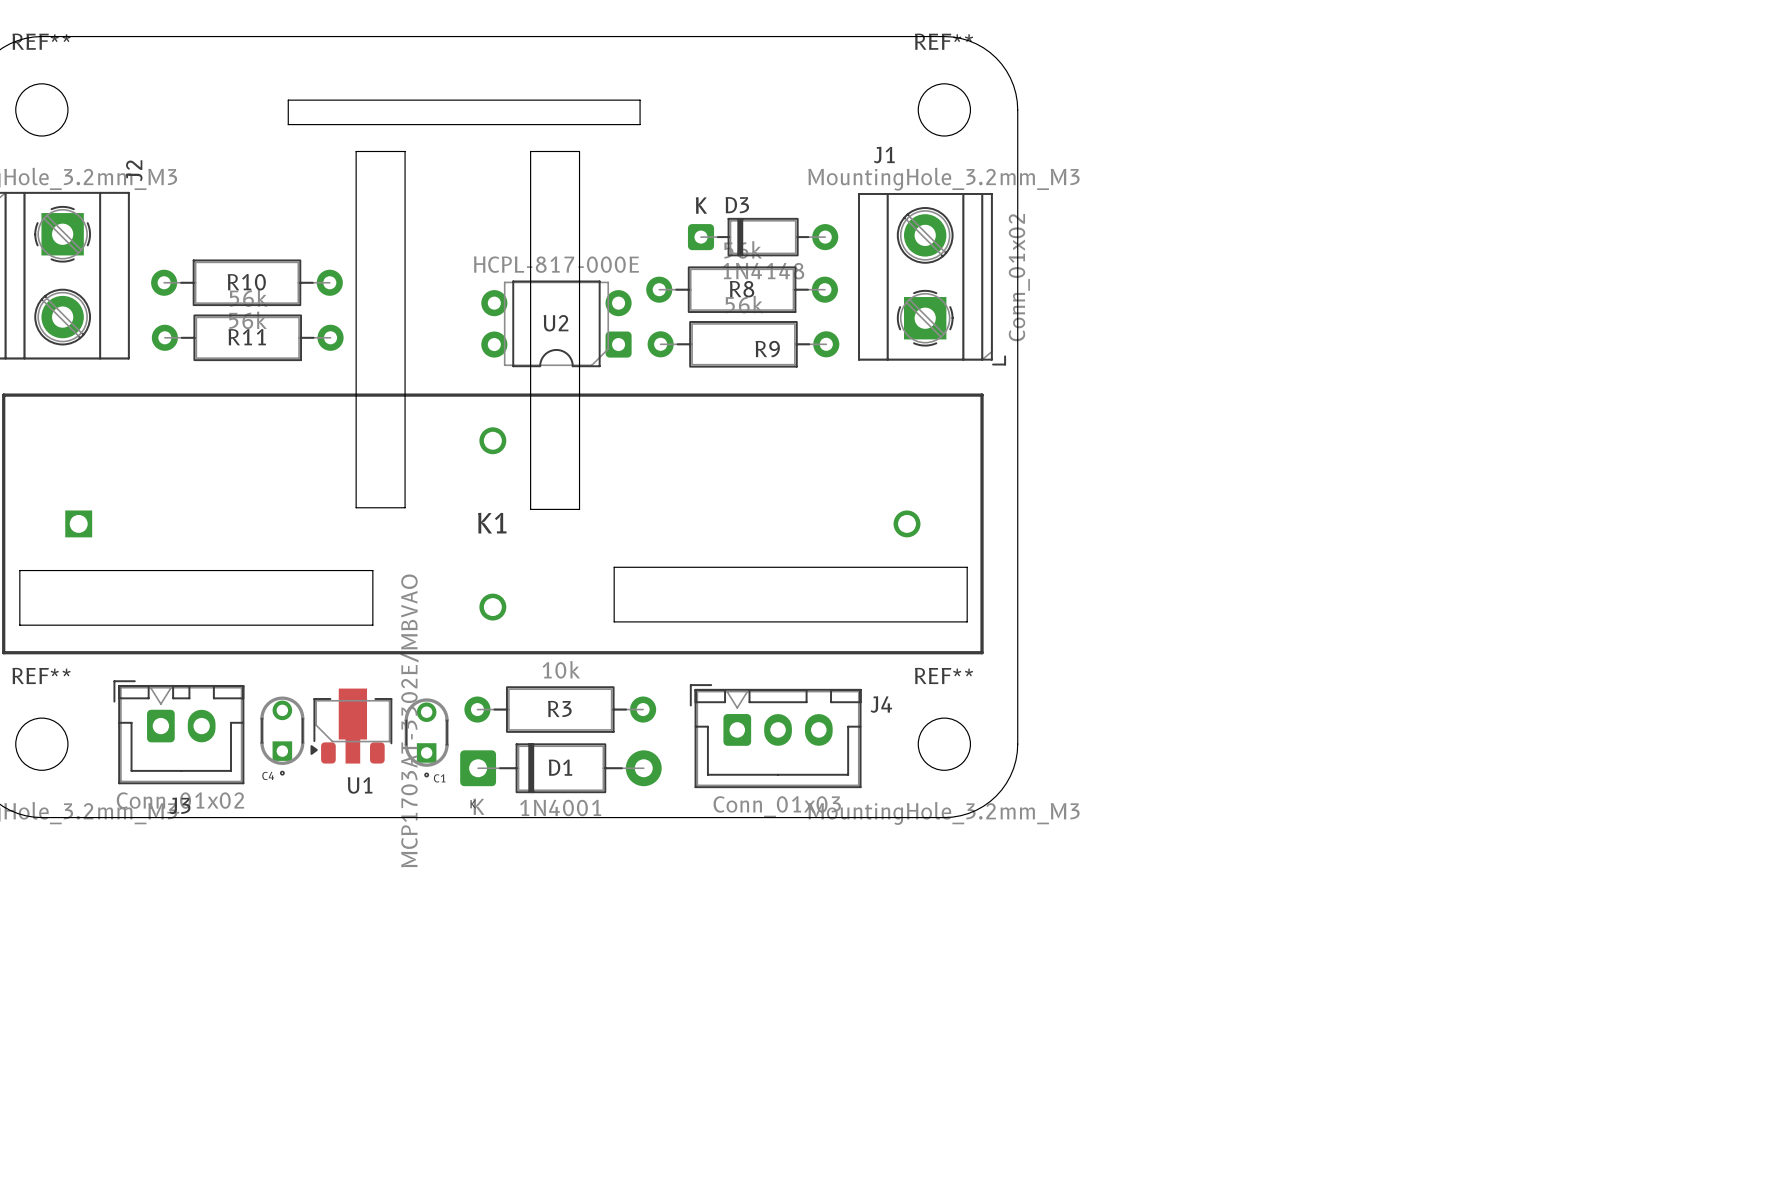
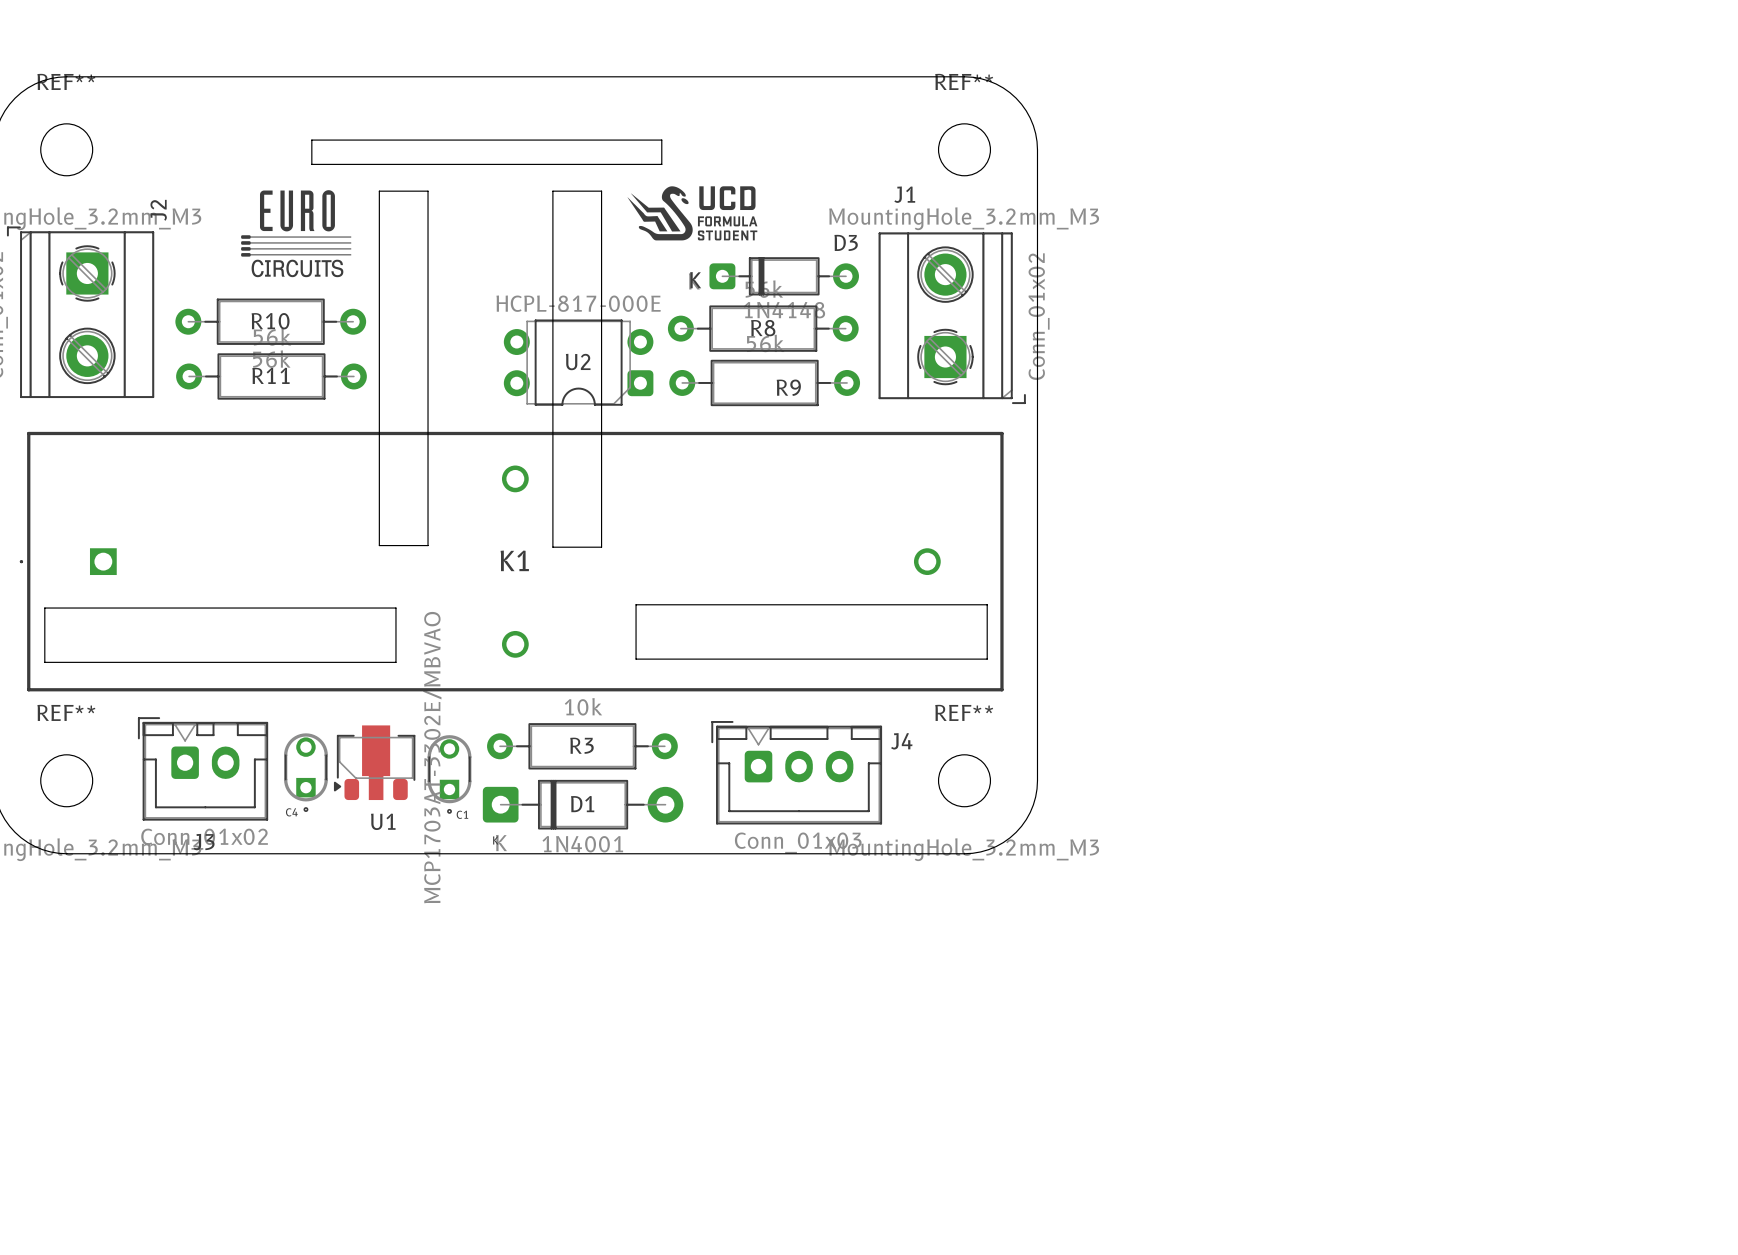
drawing: none -> [627, 186, 758, 241]
drawing: none -> [241, 190, 352, 278]
D3 name position: D3 (737, 205) -> D3 (846, 242)
D3 footprint: [687, 217, 839, 257] -> [709, 257, 859, 296]

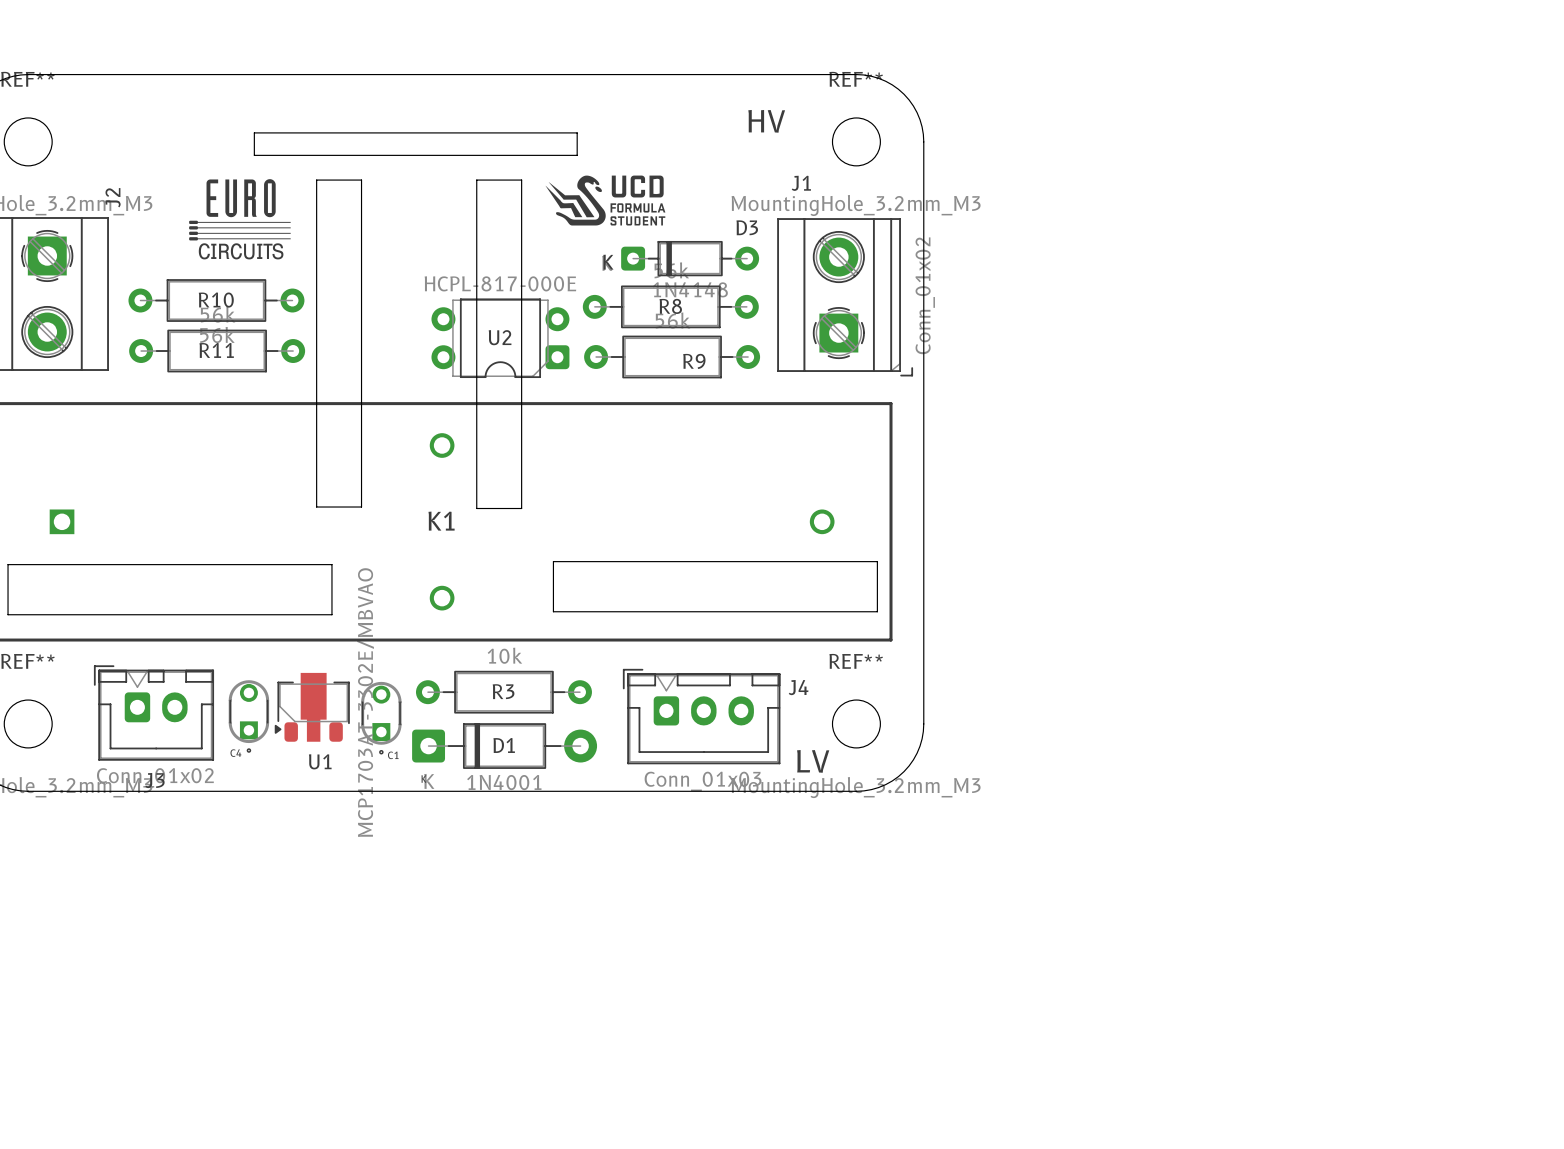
text: none -> HV (766, 121)
text: none -> LV (813, 761)

